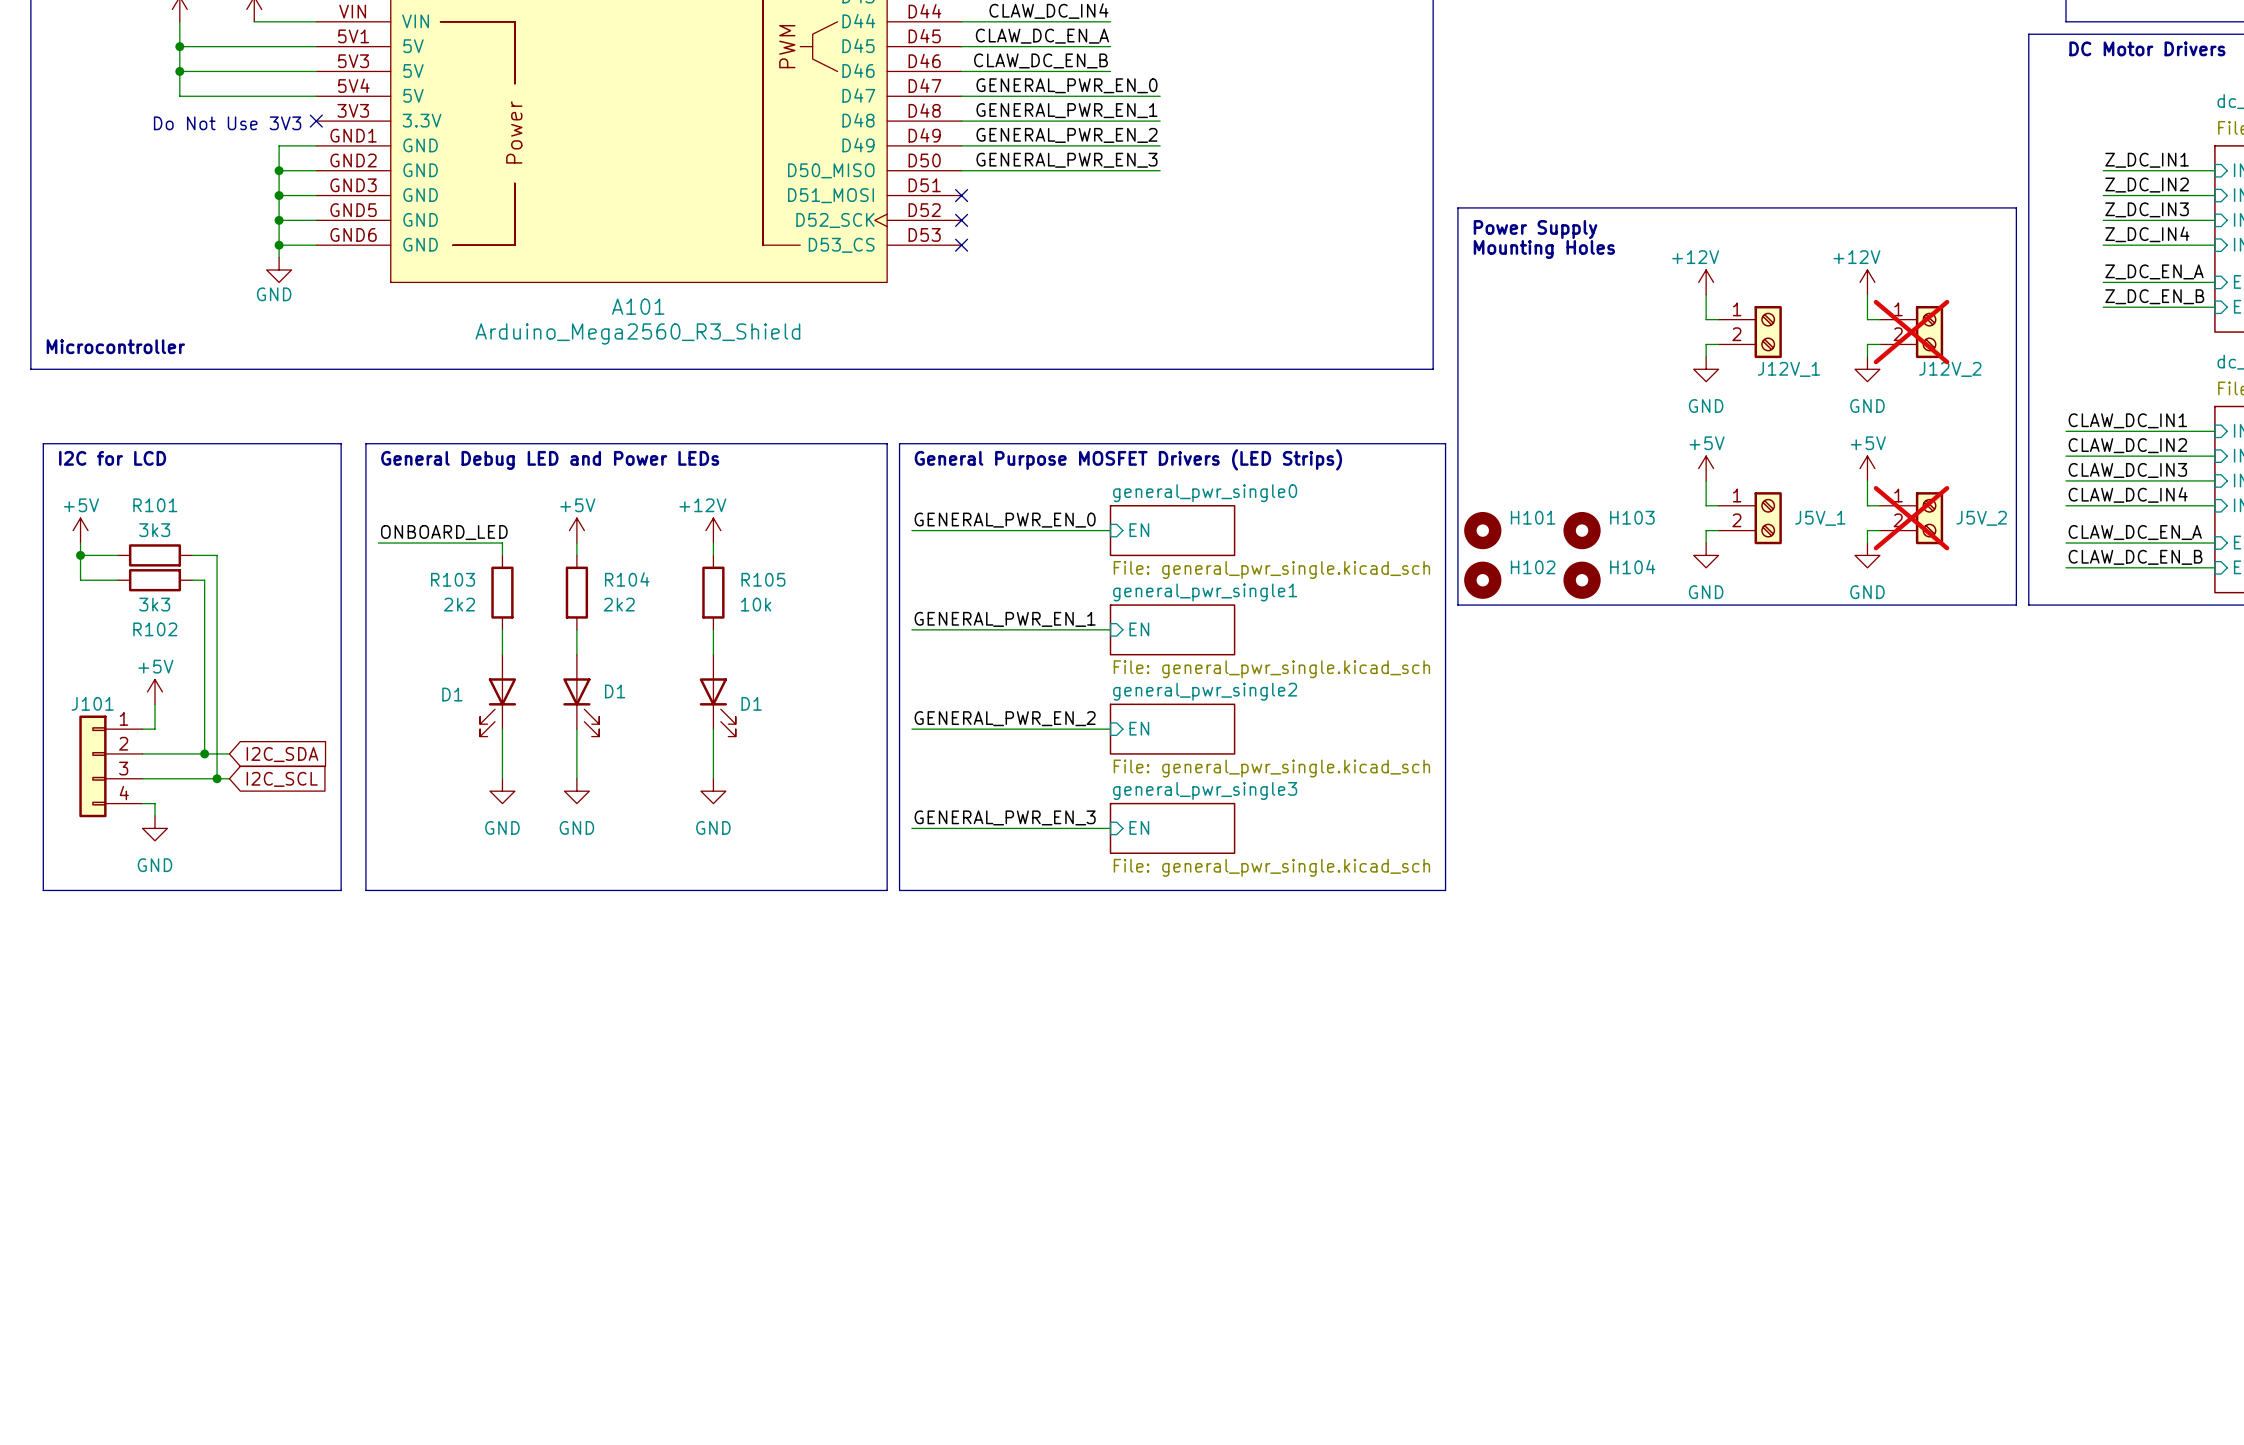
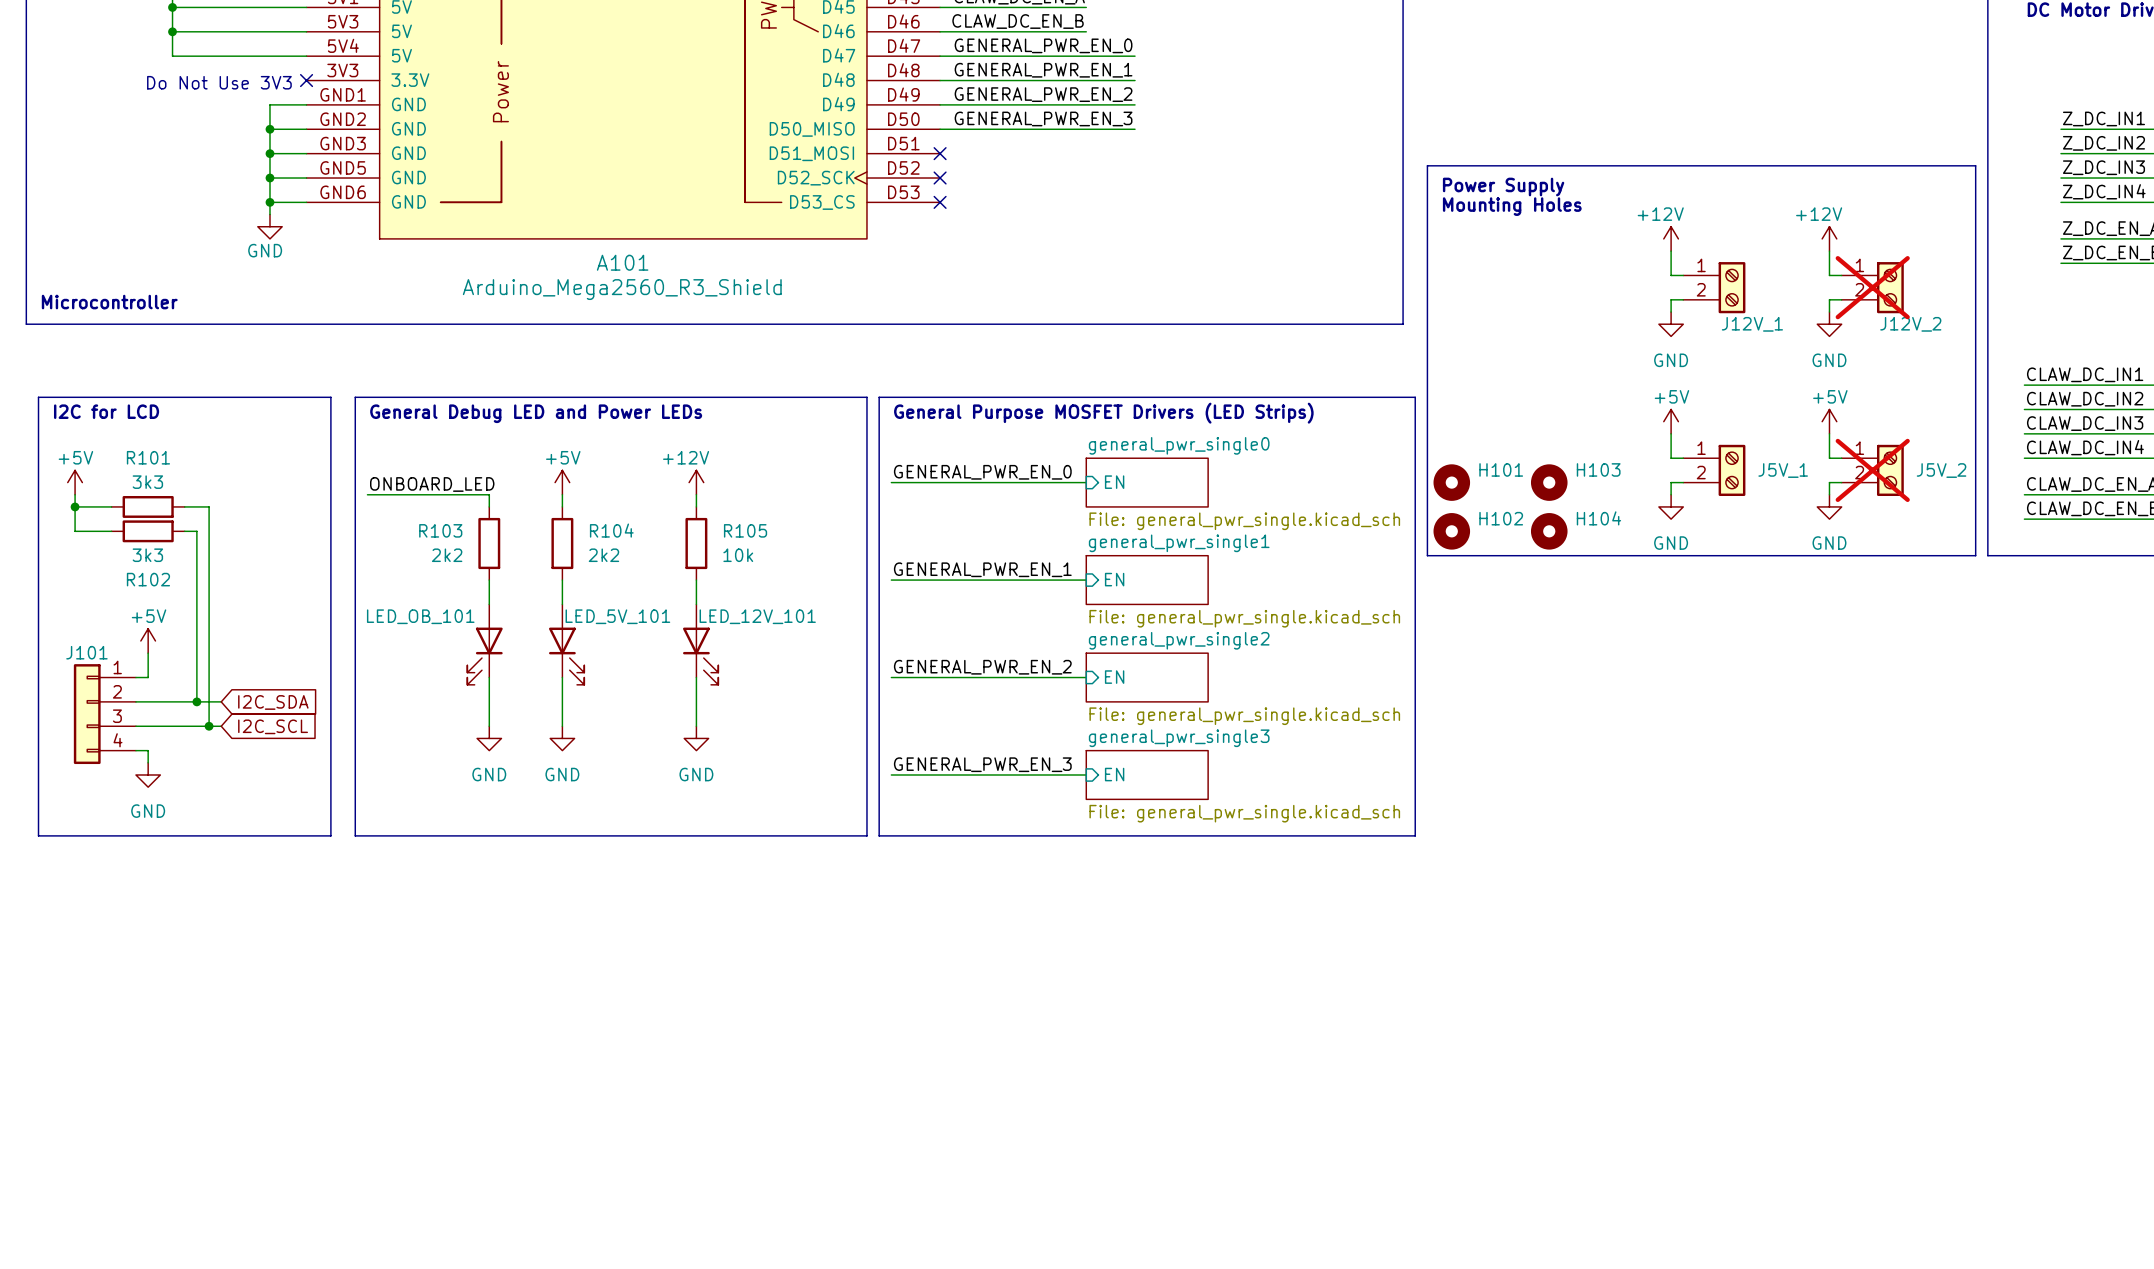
D1 name: D1 (615, 691) -> LED_5V_101 (617, 616)
D1 name: D1 (452, 694) -> LED_OB_101 (420, 616)
D1 name: D1 (751, 703) -> LED_12V_101 (757, 616)

